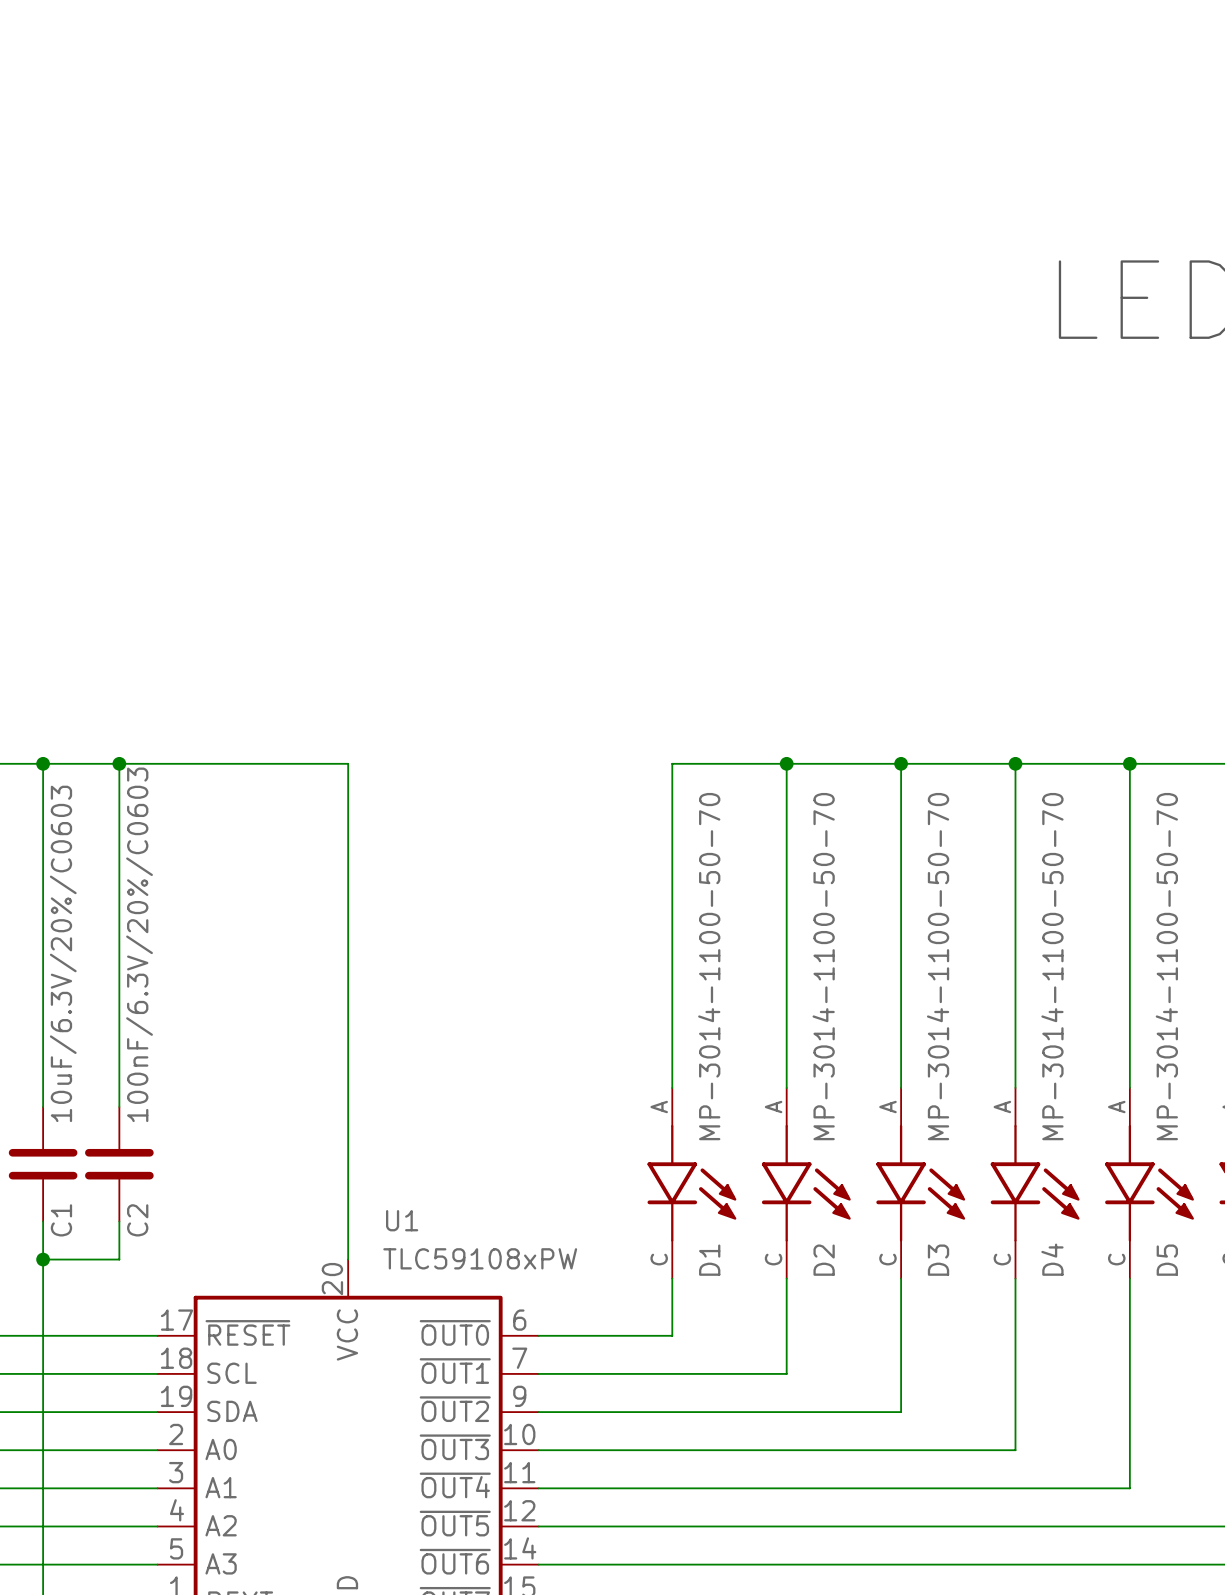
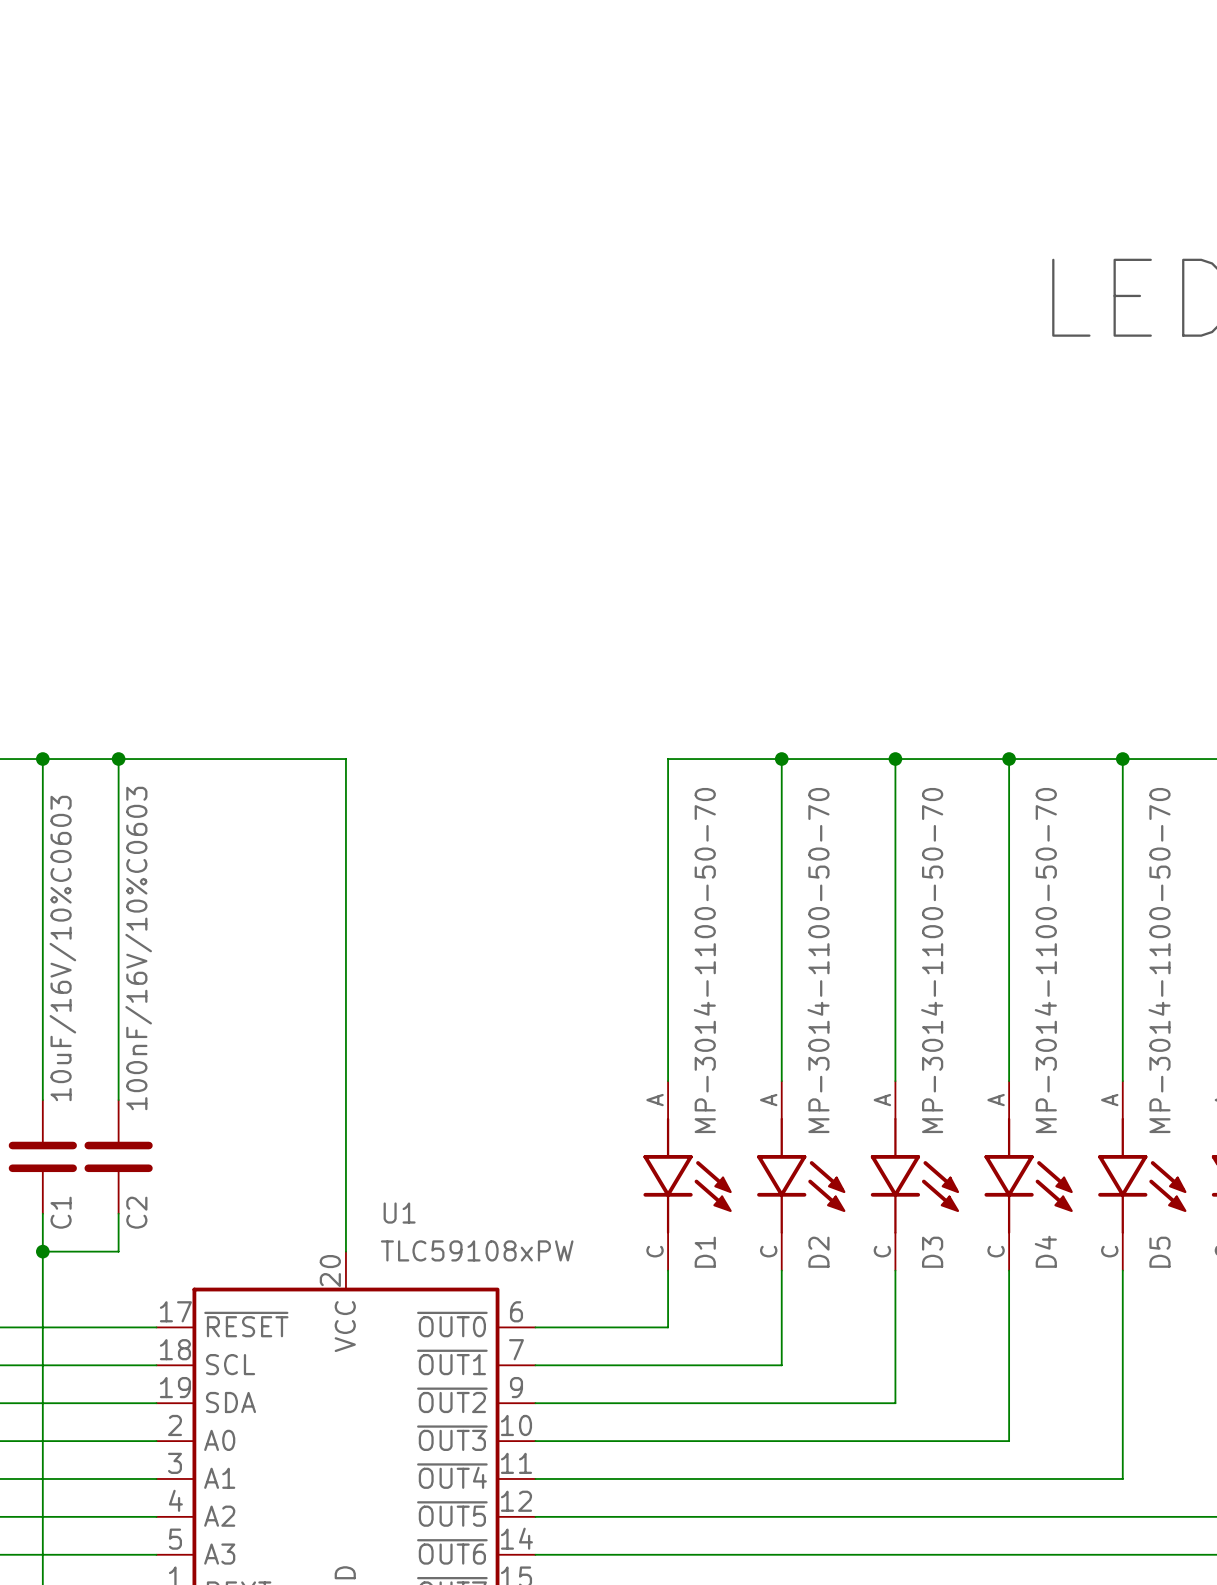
C2 value: 100nF/6.3V/20%/C0603 (139, 944) -> 100nF/16V/10%C0603 (138, 948)
C1 value: 10uF/6.3V/20%/C0603 (63, 953) -> 10uF/16V/10%C0603 (62, 948)

